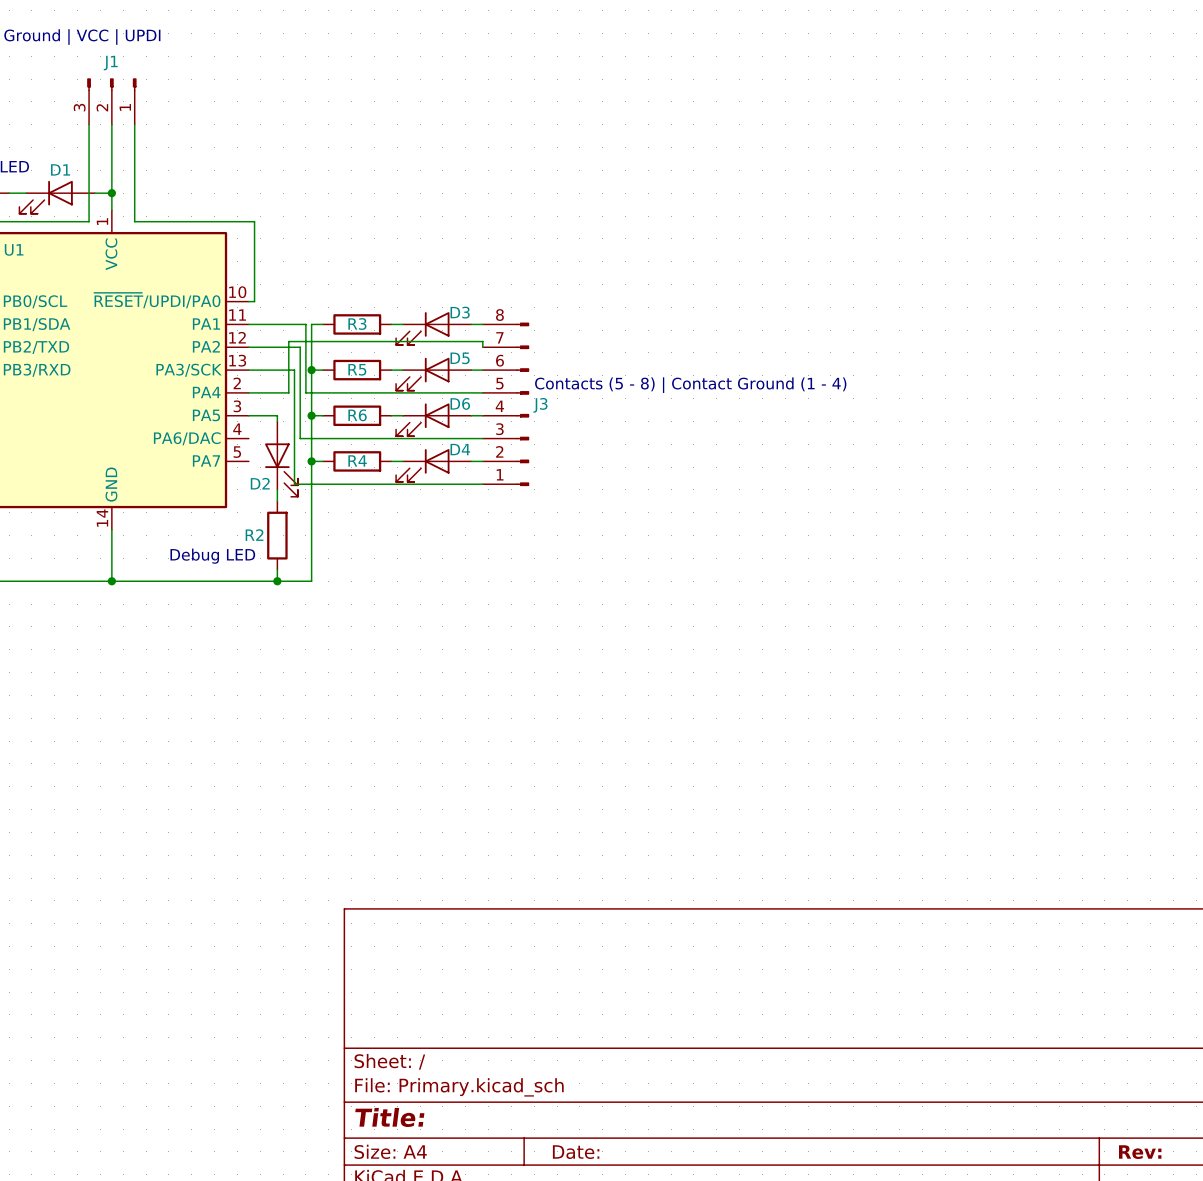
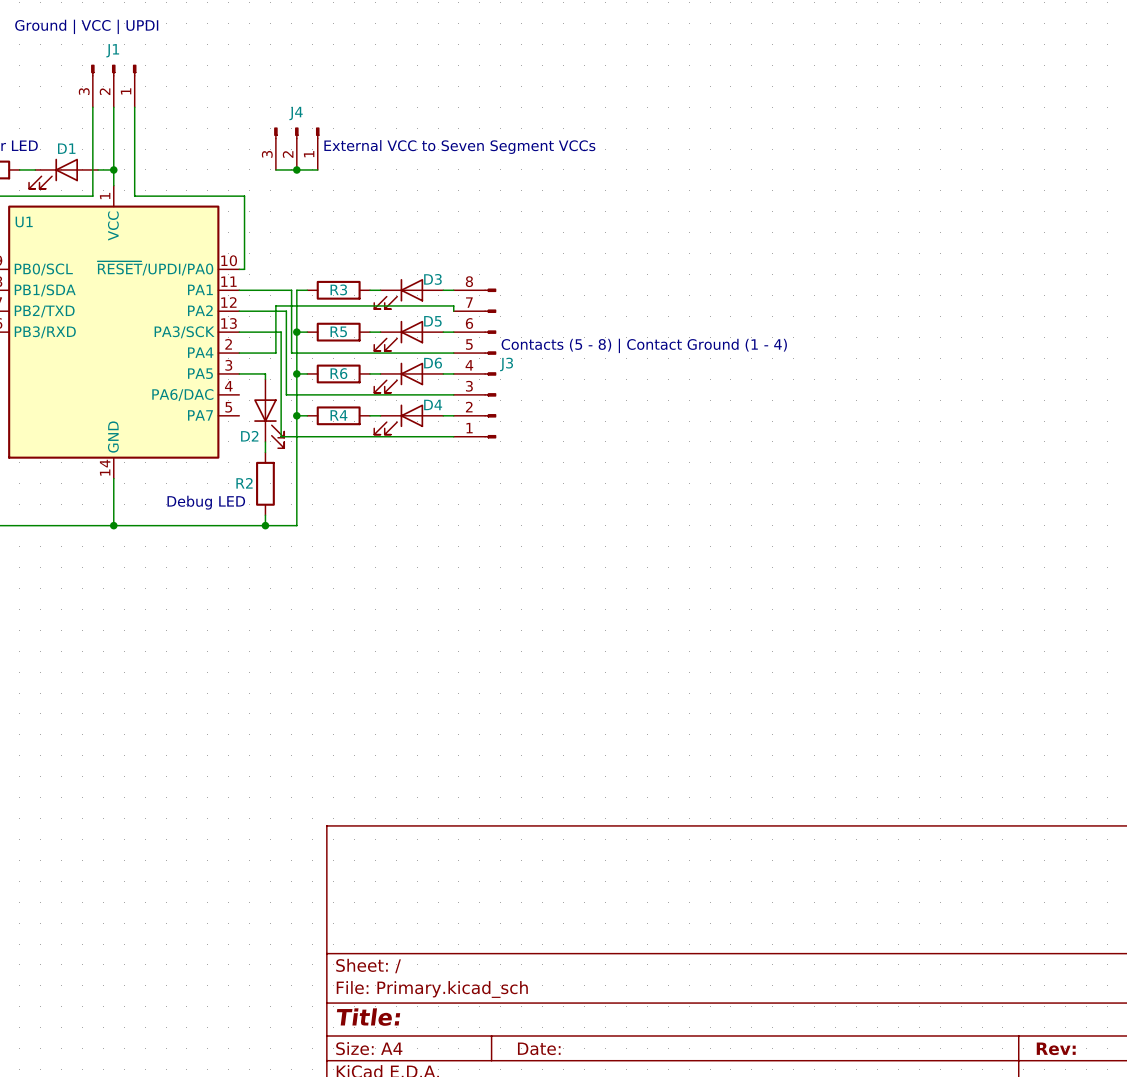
text: none -> External VCC to Seven Segment VCCs (459, 147)
J4: none -> (296, 148)
wire: none -> (275, 169) (317, 169)
junction: none -> (296, 169)

